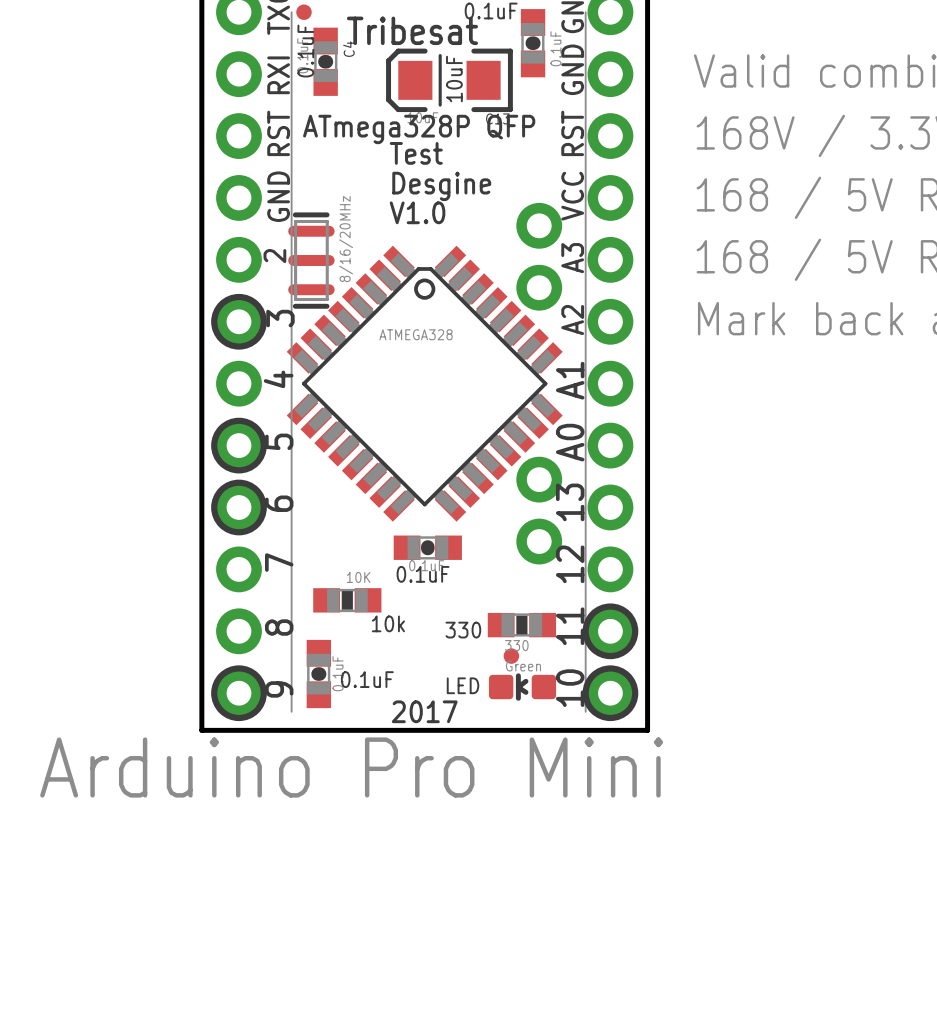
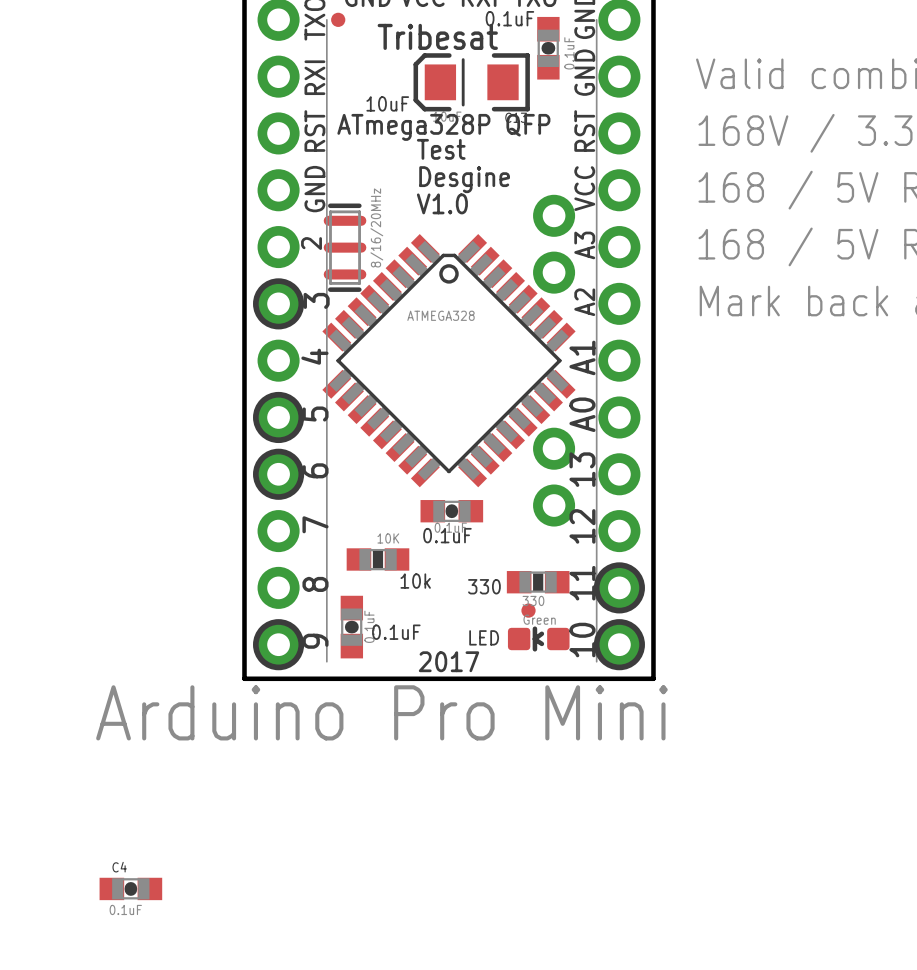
text: 0.1uF (305, 51) -> none
C4 rotation: 0° (325, 61) -> 90° clockwise (130, 888)
C4 position: (325, 61) -> (130, 888)
text rotation: 0° (454, 79) -> 90° clockwise (387, 103)
text position: 10uF (454, 79) -> 10uF (387, 103)

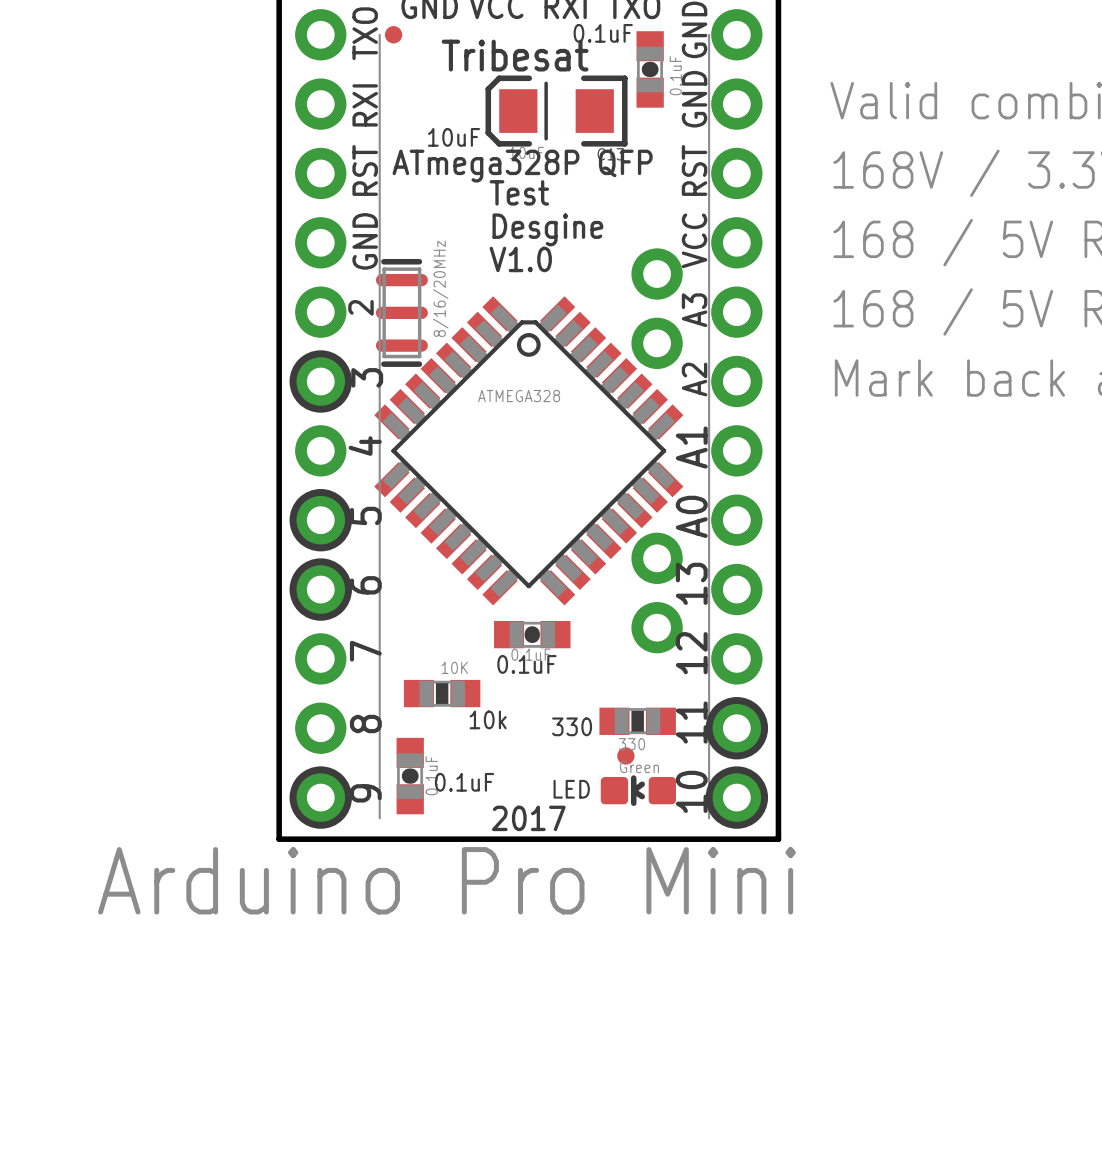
C4: 0.1uF (130, 888) -> none

